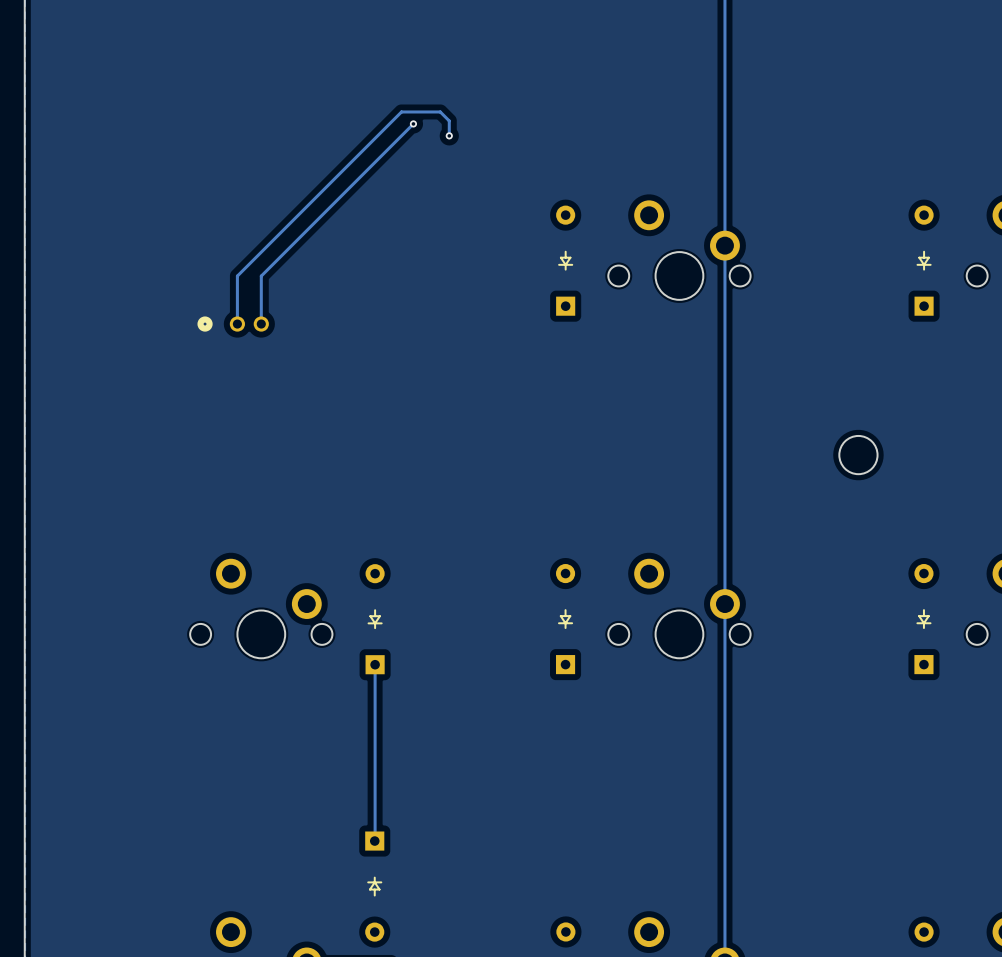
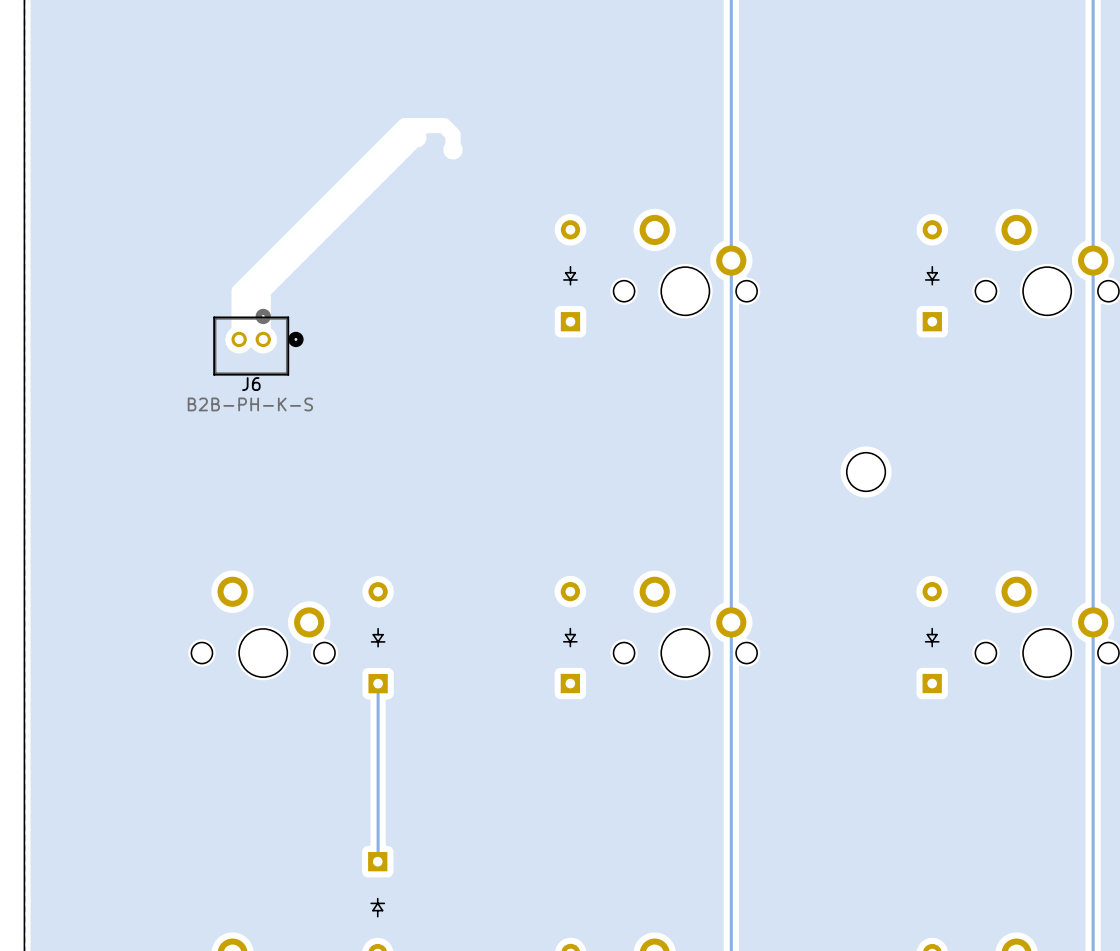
track: (413, 123) (261, 276) (261, 324) -> none
via: (413, 123) -> none
track: (449, 135) (449, 120) (440, 111) (401, 111) (237, 276) (237, 324) -> none
via: (449, 135) -> none
J6 side: top (233, 324) -> bottom (258, 342)

